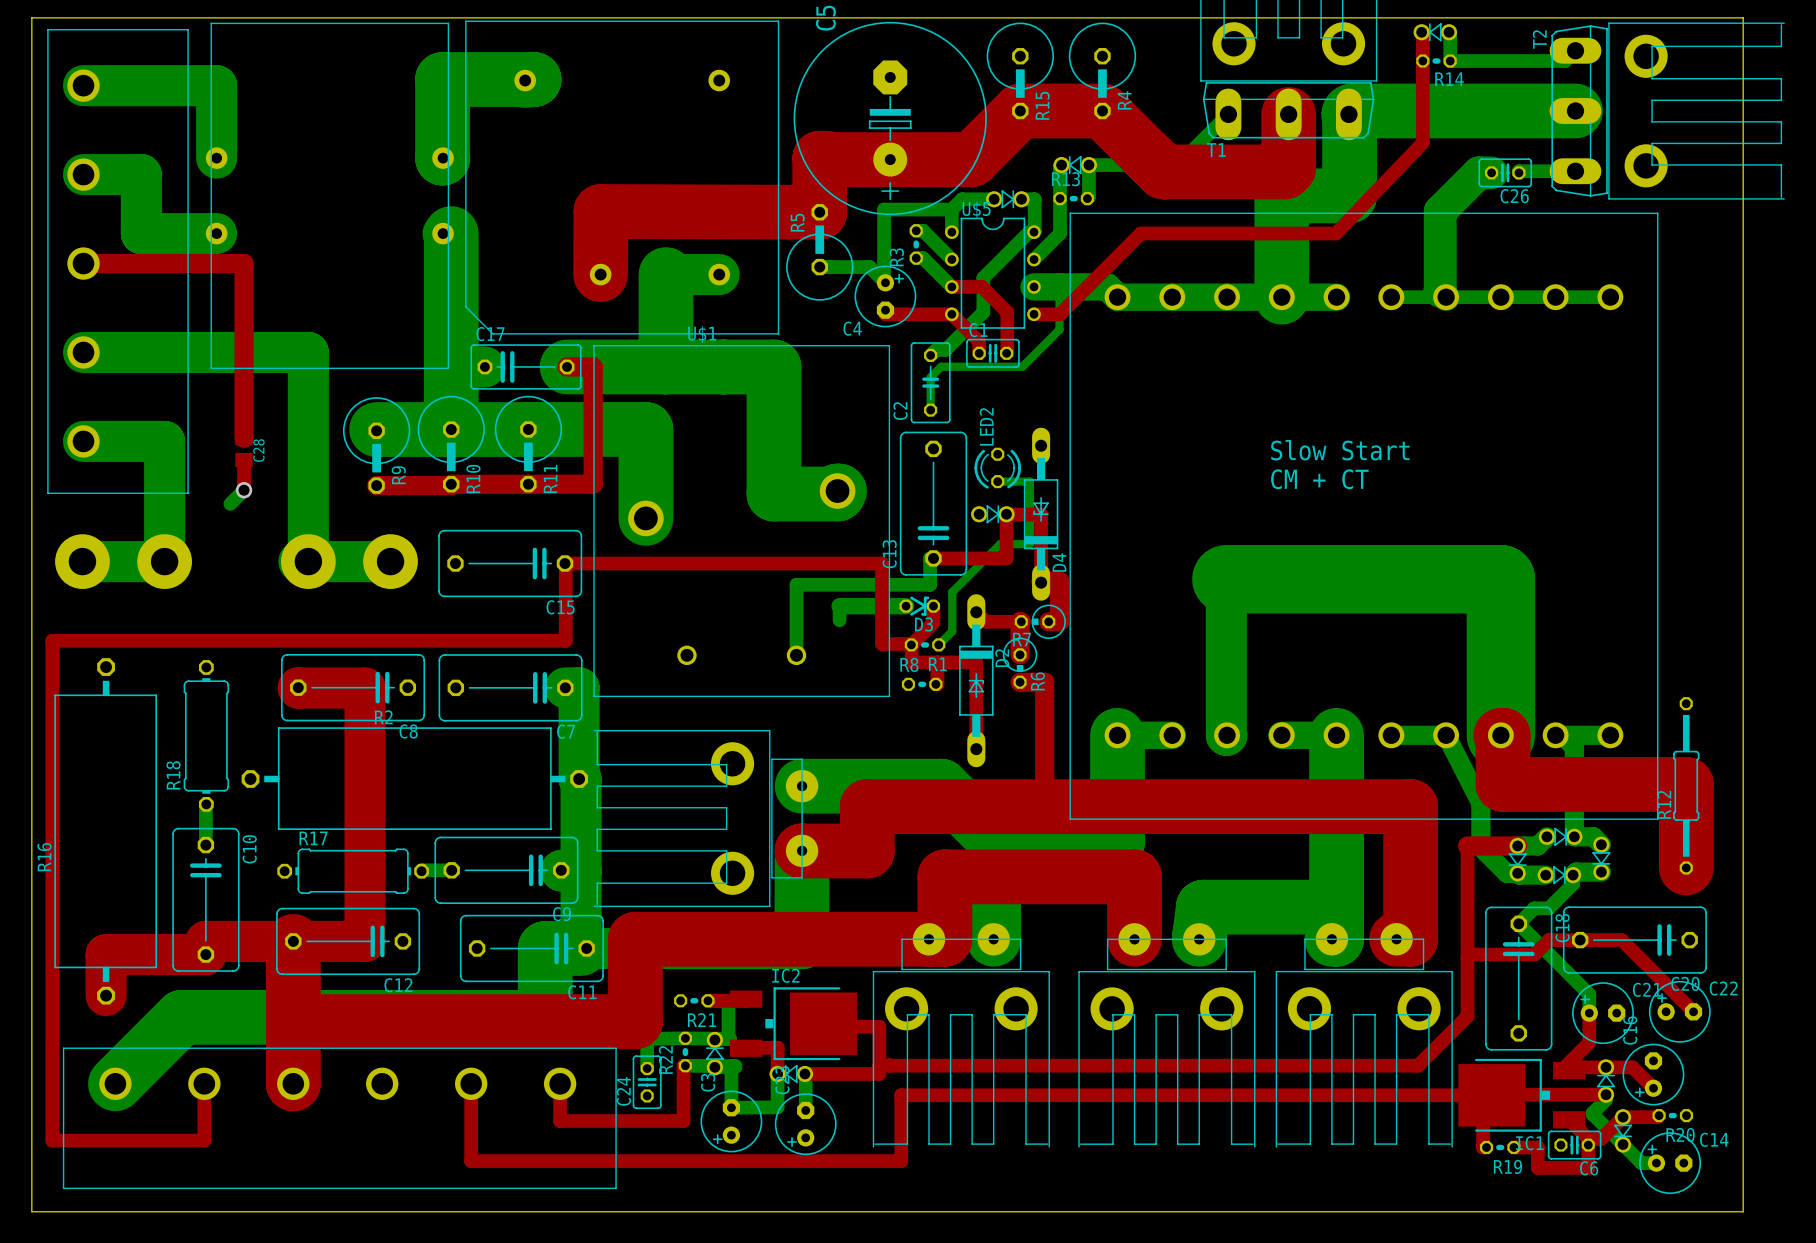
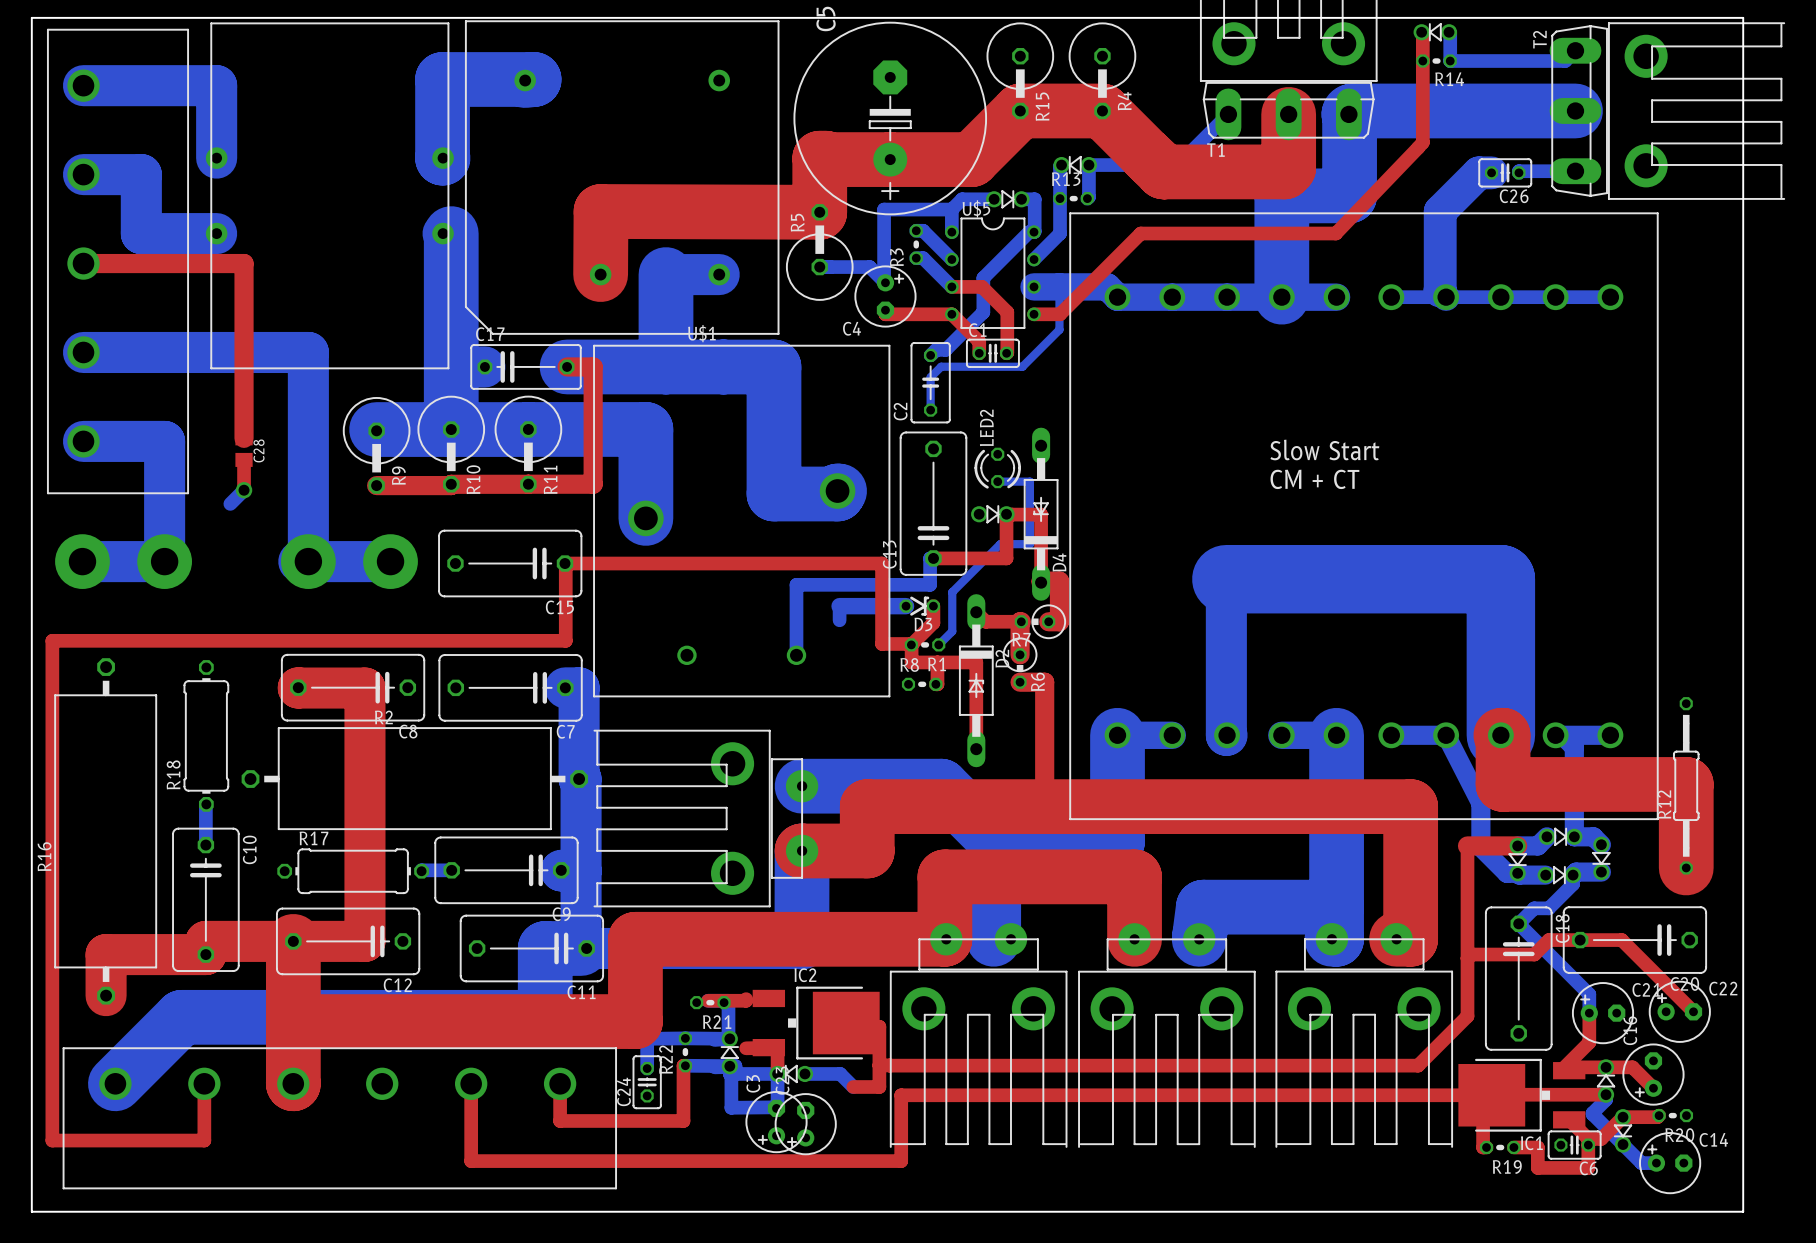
R21 position: (694, 1000) -> (710, 1002)
IC2 position: (793, 1023) -> (816, 1023)
part position: (961, 1035) -> (978, 1035)
part position: (714, 1053) -> (729, 1052)
bottom track: none -> (729, 1066) (729, 1073) (777, 1073)
top track: (804, 1073) (879, 1073) -> (853, 1087) (879, 1087) (879, 1073)
bottom track: (805, 1073) (805, 1110) -> (805, 1073) (840, 1073) (853, 1087)
C3 position: (731, 1121) -> (776, 1122)

